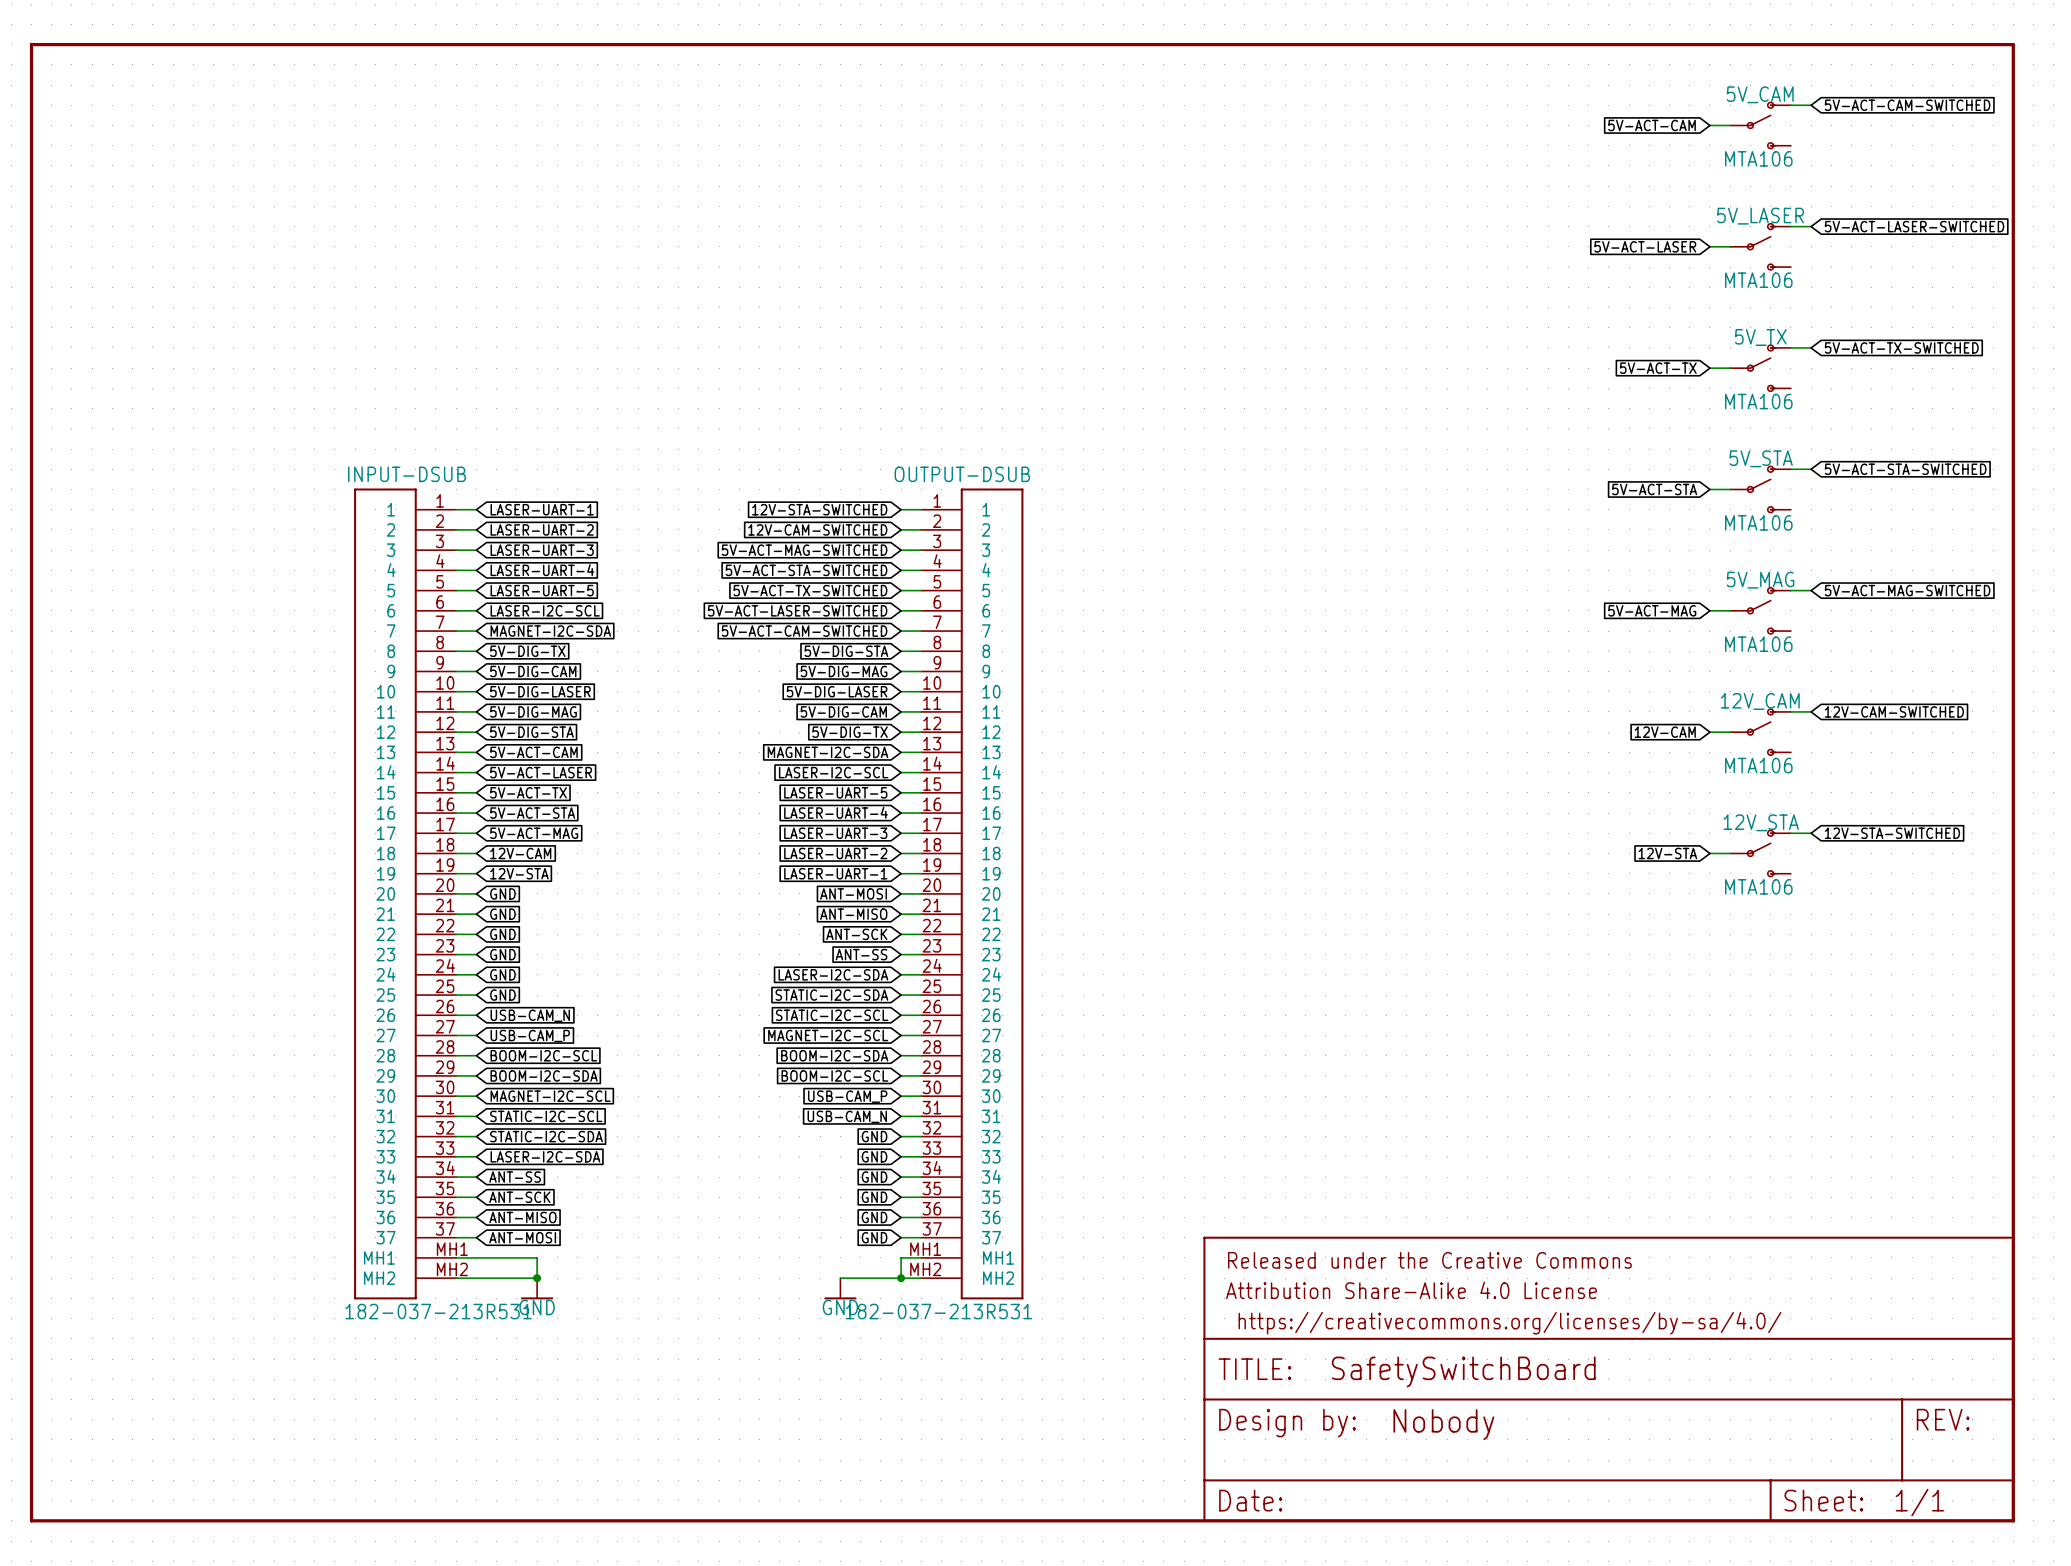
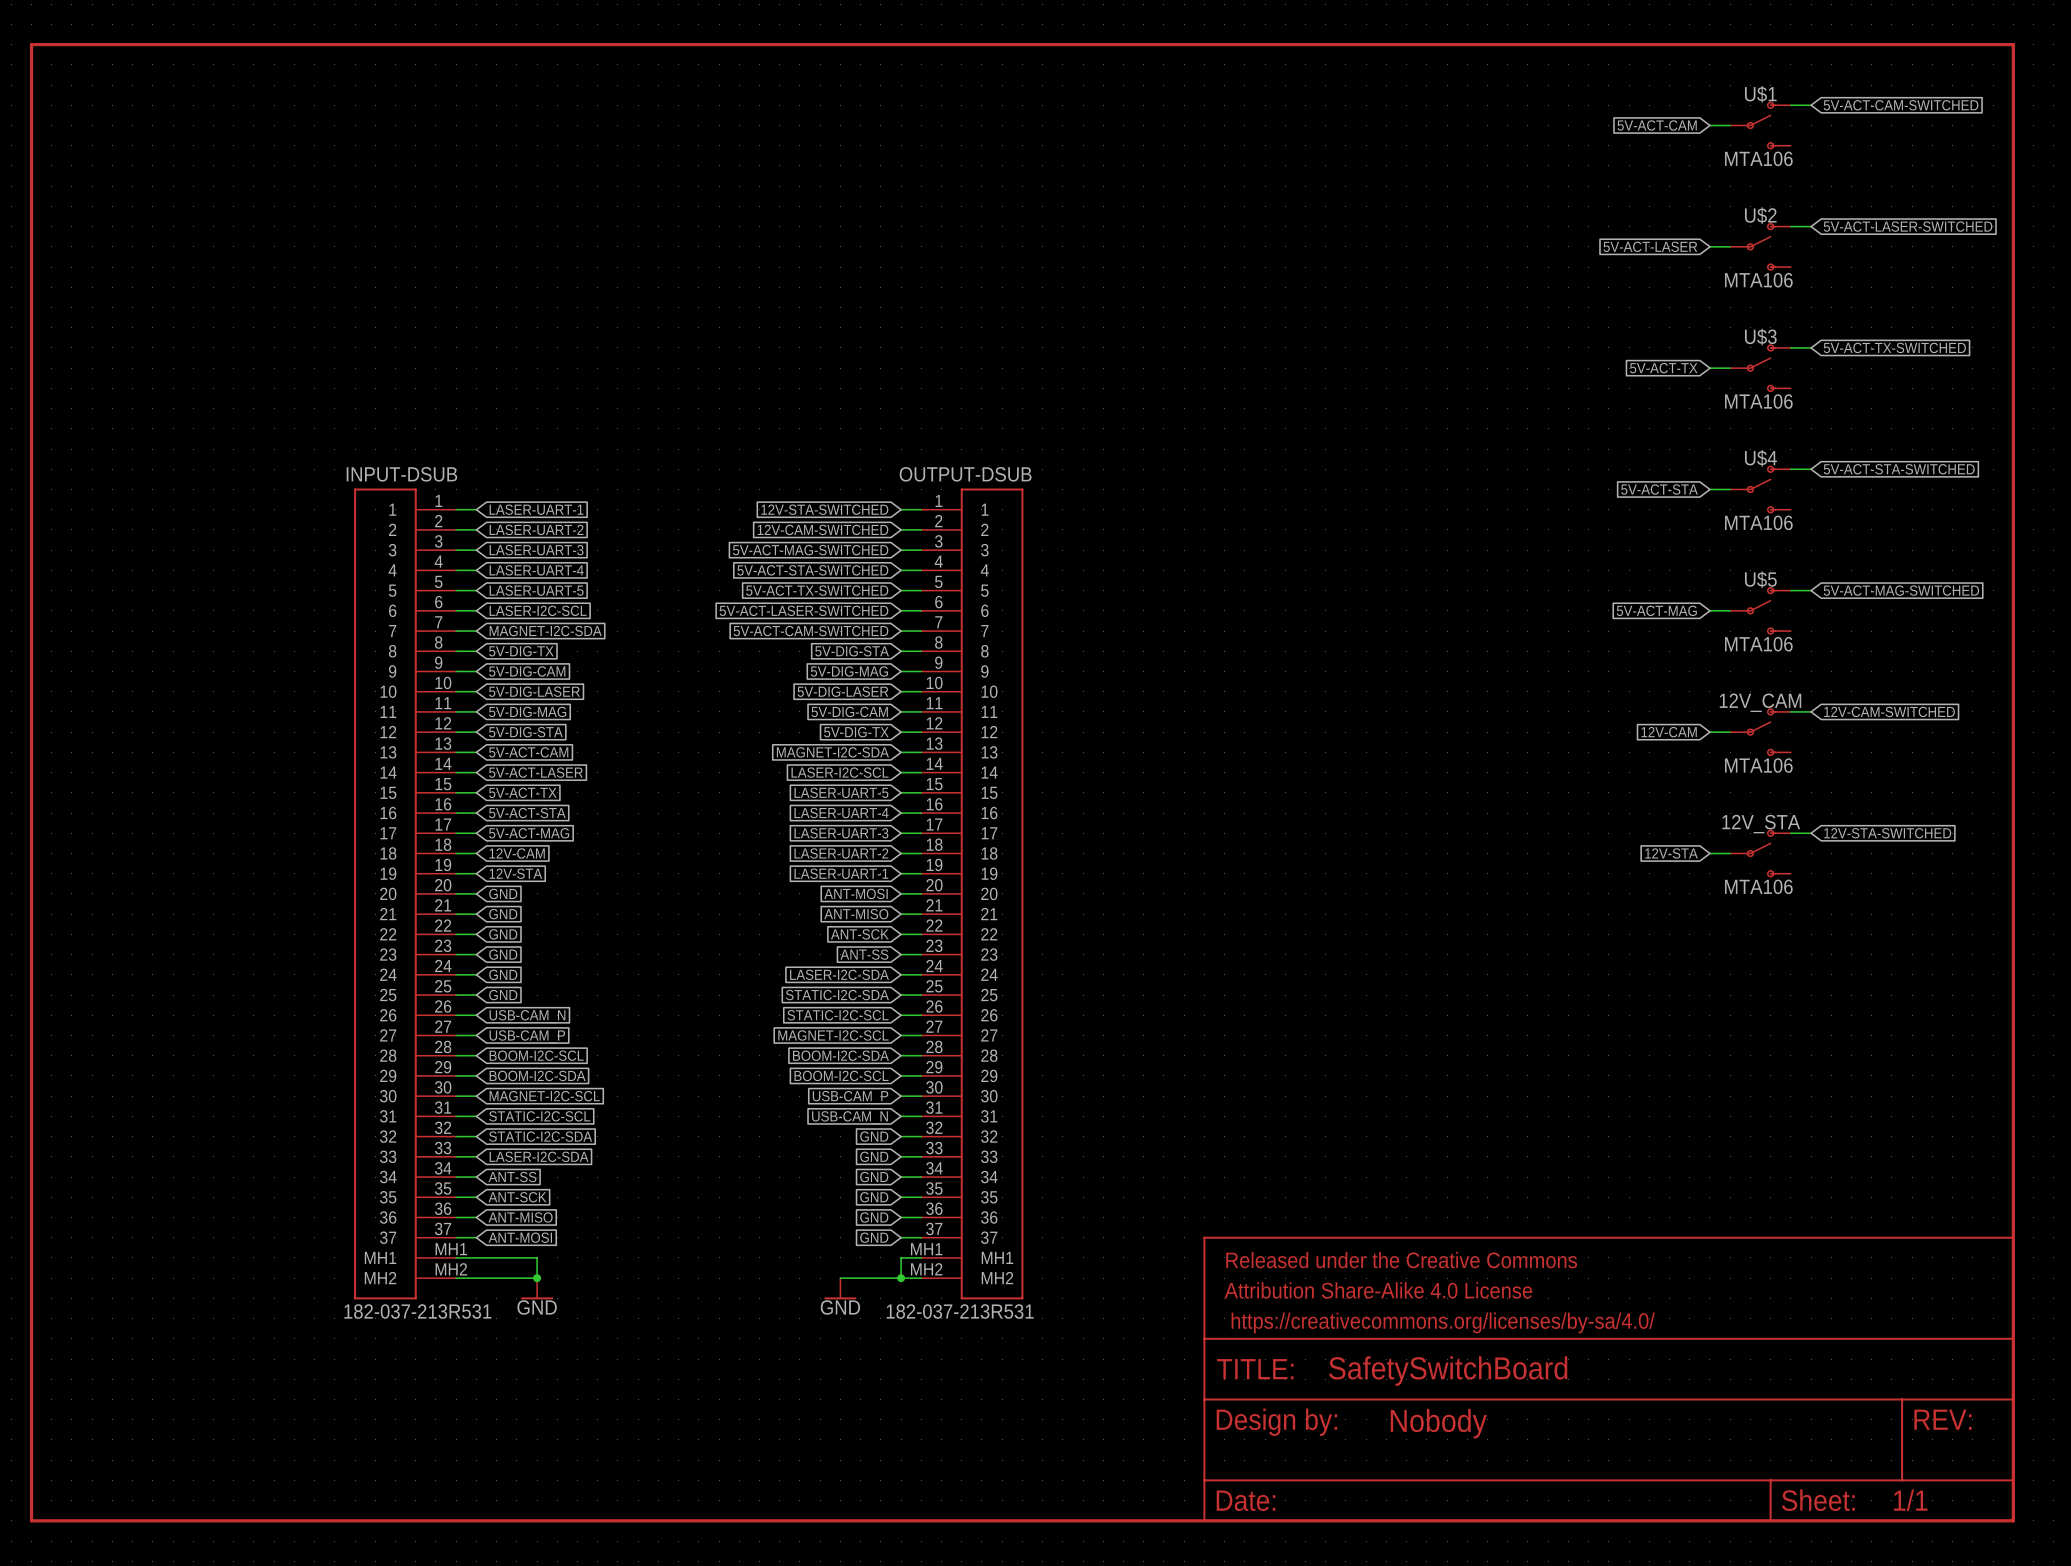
5V_CAM name: 5V_CAM (1760, 94) -> U$1 (1760, 94)
5V_LASER name: 5V_LASER (1760, 216) -> U$2 (1760, 215)
5V_TX name: 5V_TX (1760, 337) -> U$3 (1760, 336)
5V_STA name: 5V_STA (1761, 458) -> U$4 (1760, 458)
5V_MAG name: 5V_MAG (1760, 580) -> U$5 (1760, 579)

